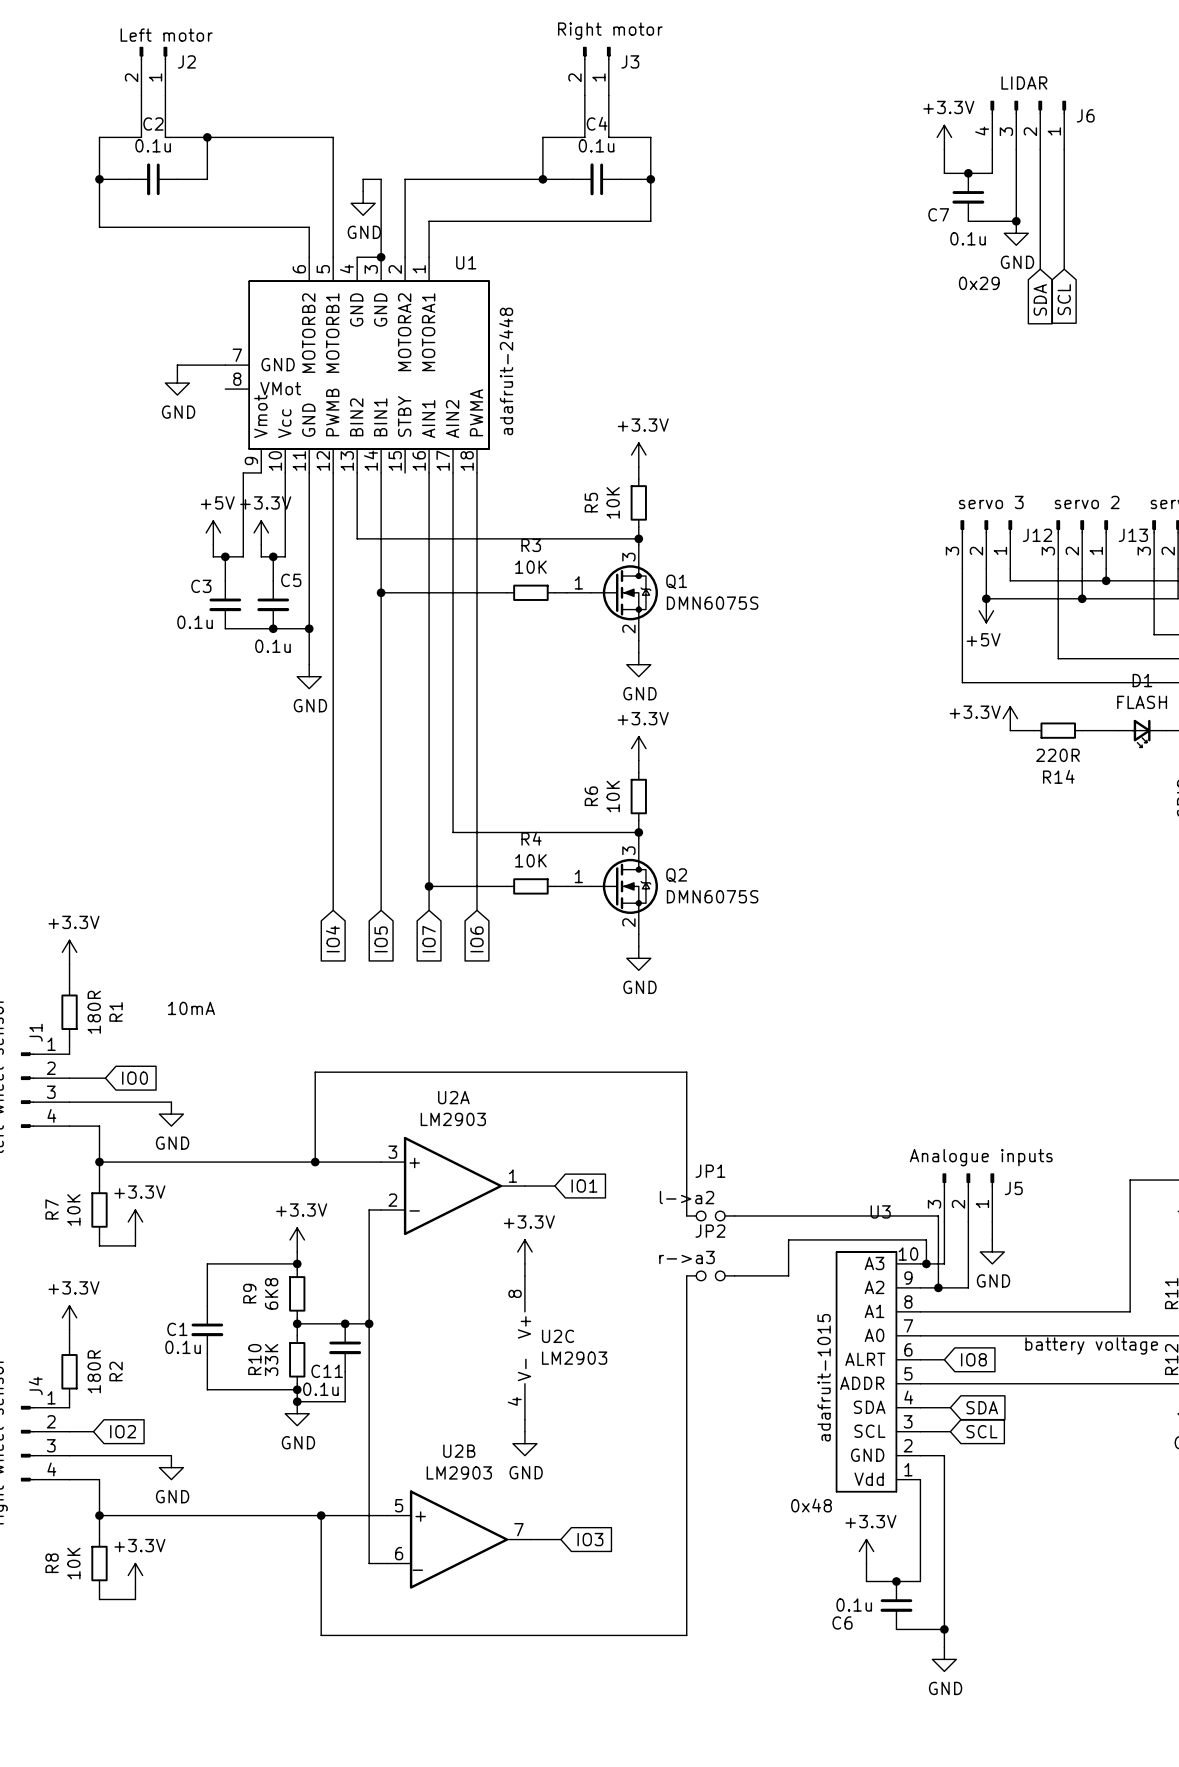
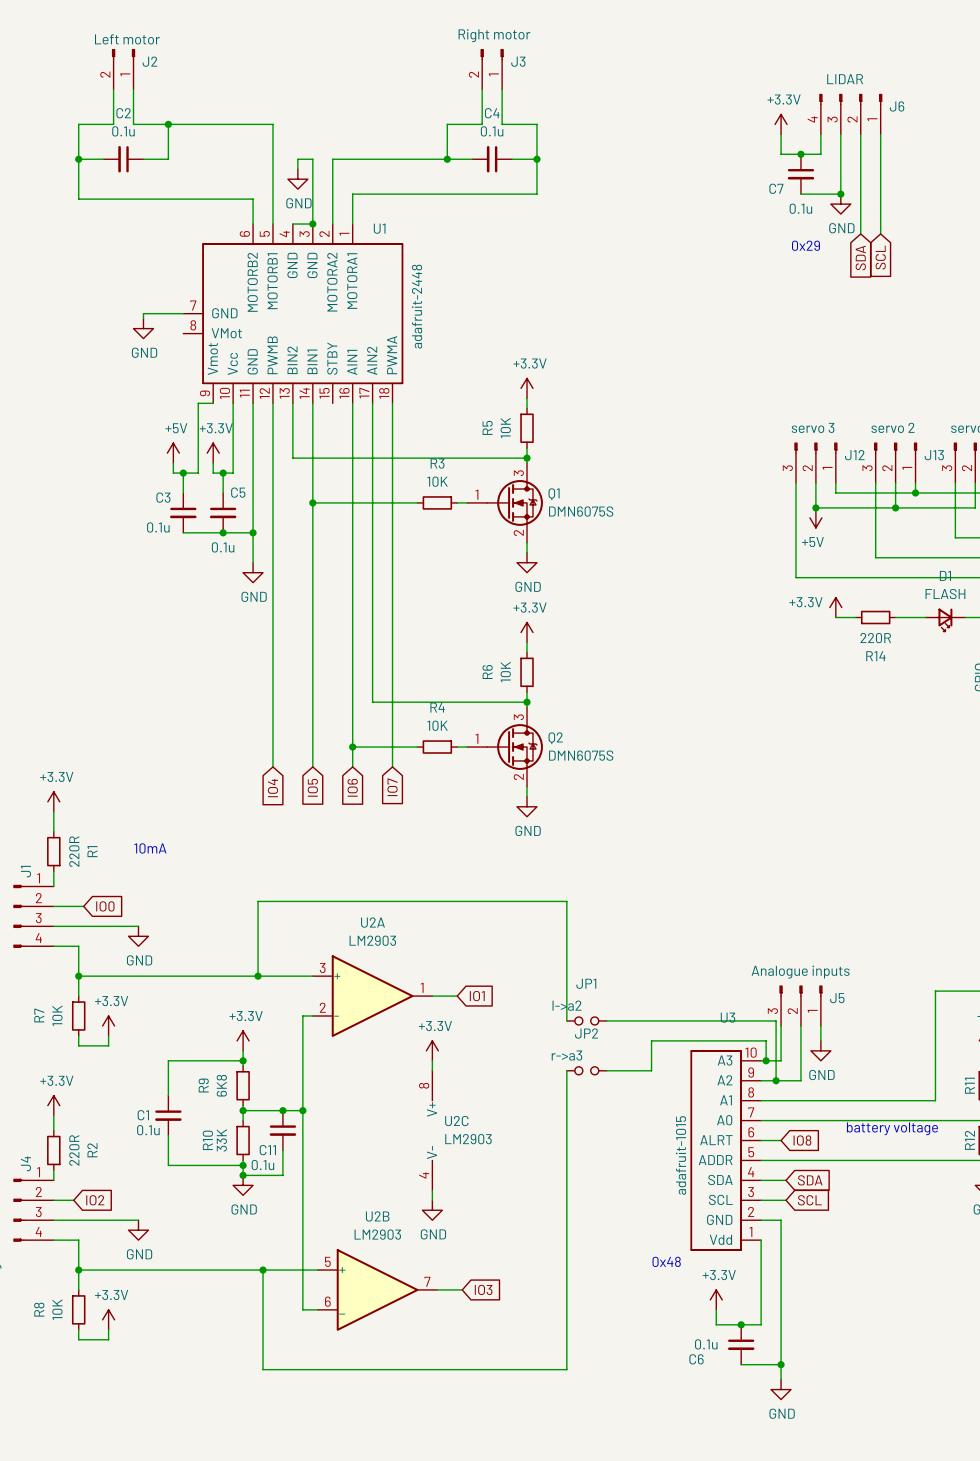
global label: IO7 (429, 939) -> IO6 (352, 787)
global label: IO6 (477, 939) -> IO7 (392, 787)
R1 value: 180R (94, 1012) -> 220R (74, 851)
R2 value: 180R (94, 1371) -> 220R (74, 1150)

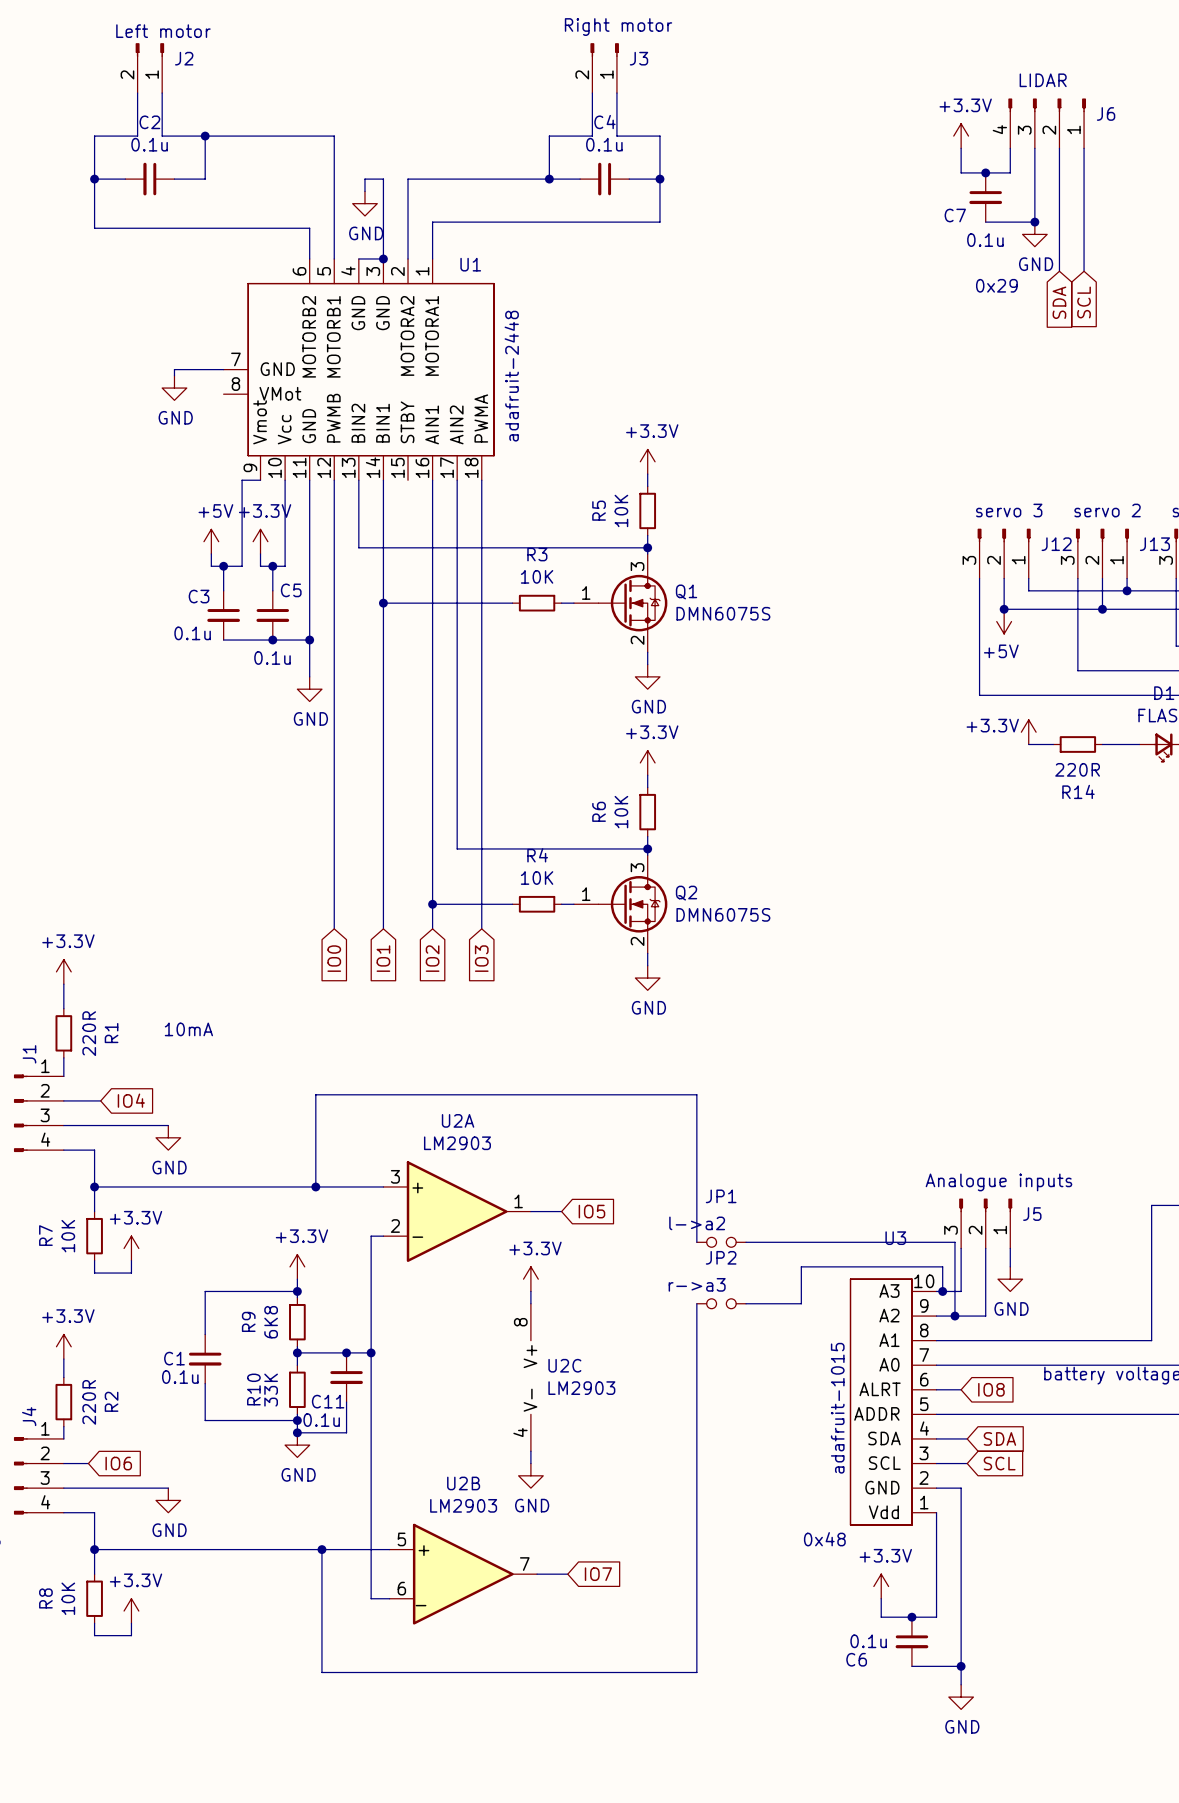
global label: IO5 (312, 787) -> IO1 (383, 958)
global label: IO6 (352, 787) -> IO2 (432, 958)
global label: IO7 (392, 787) -> IO3 (481, 958)
global label: IO4 (272, 788) -> IO0 (334, 958)
global label: IO0 (105, 906) -> IO4 (131, 1100)
global label: IO1 (477, 996) -> IO5 (591, 1211)
global label: IO2 (95, 1200) -> IO6 (118, 1463)
global label: IO3 (483, 1289) -> IO7 (598, 1574)

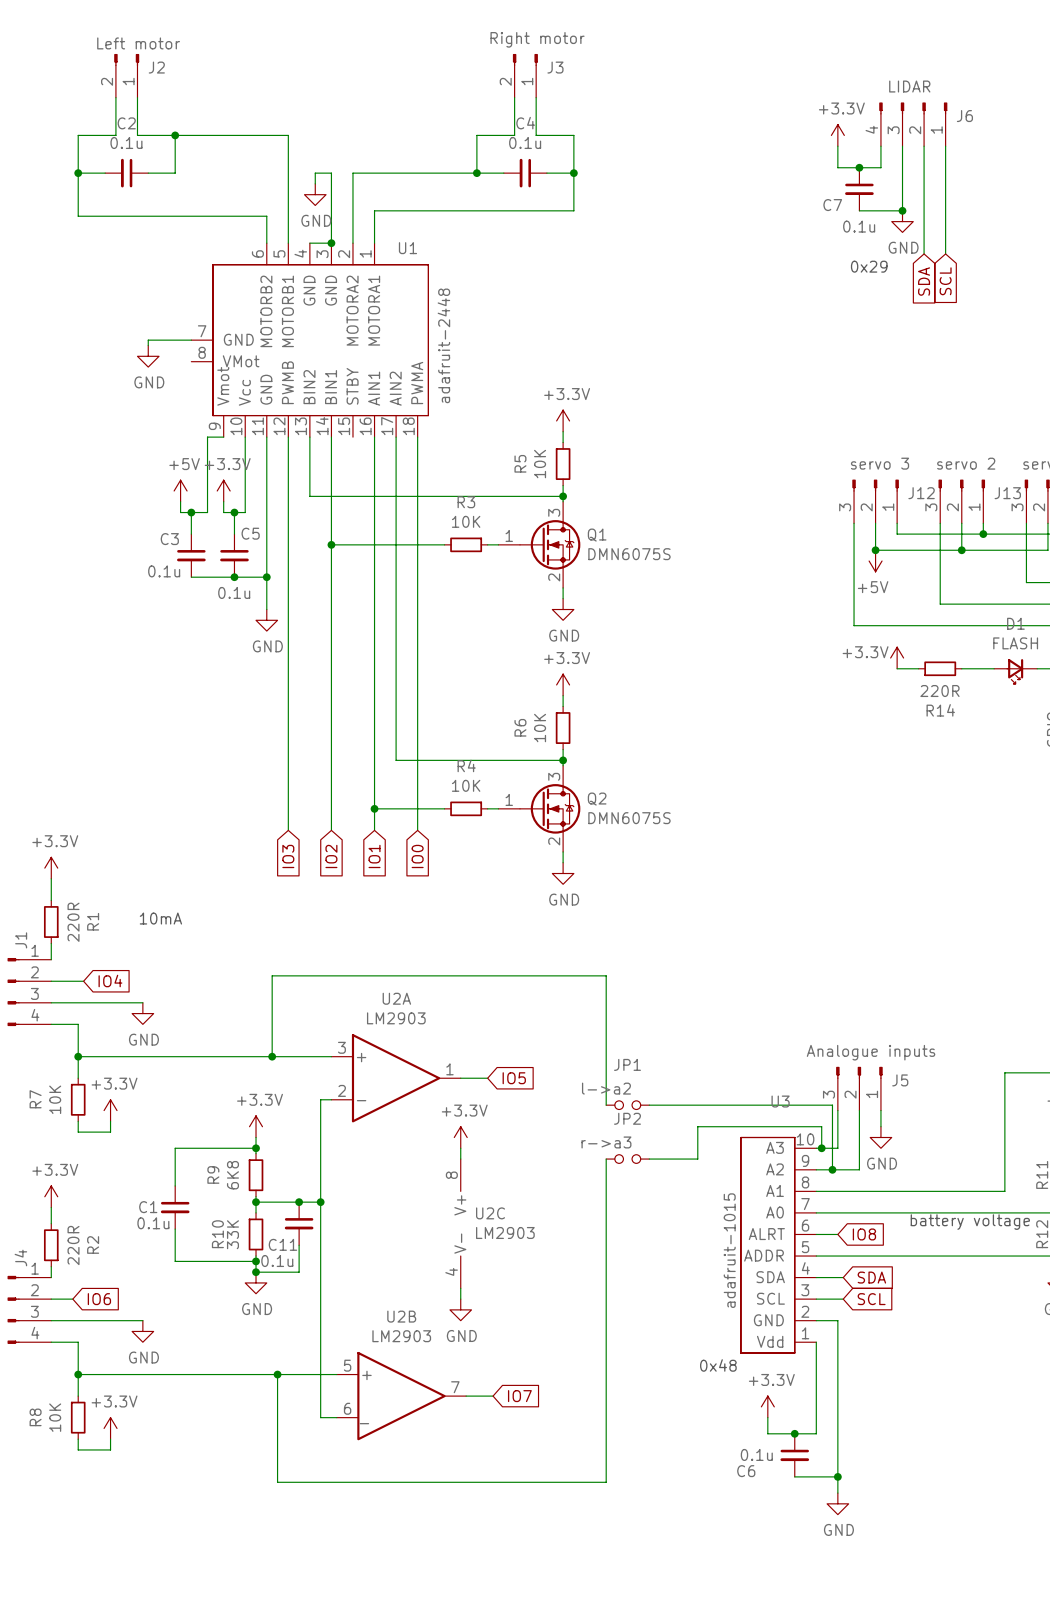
global label: IO0 (334, 958) -> IO3 (288, 856)
global label: IO1 (383, 958) -> IO2 (331, 856)
global label: IO2 (432, 958) -> IO1 (374, 856)
global label: IO3 (481, 958) -> IO0 (417, 856)

